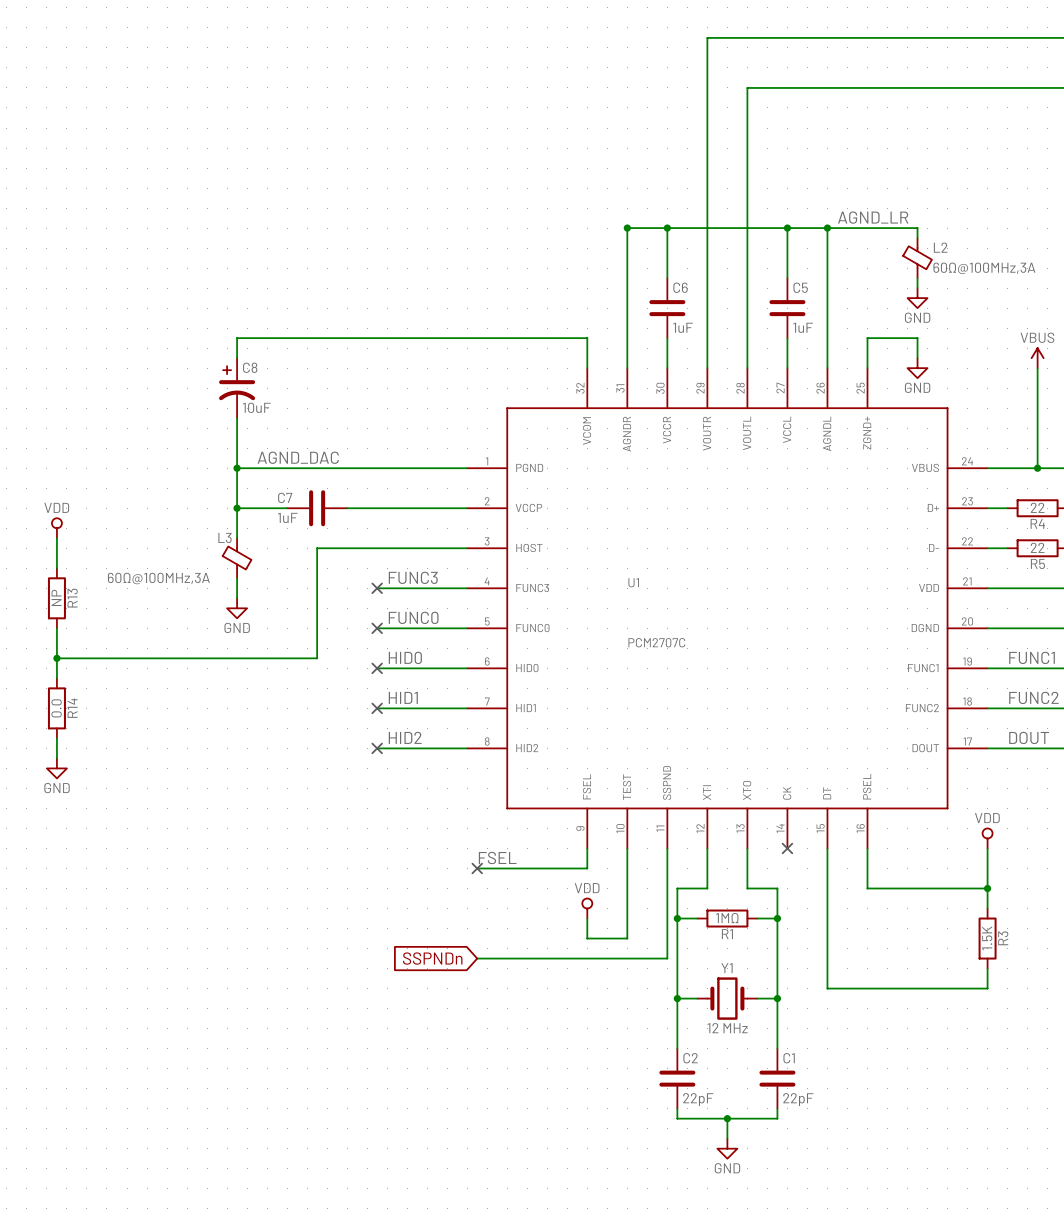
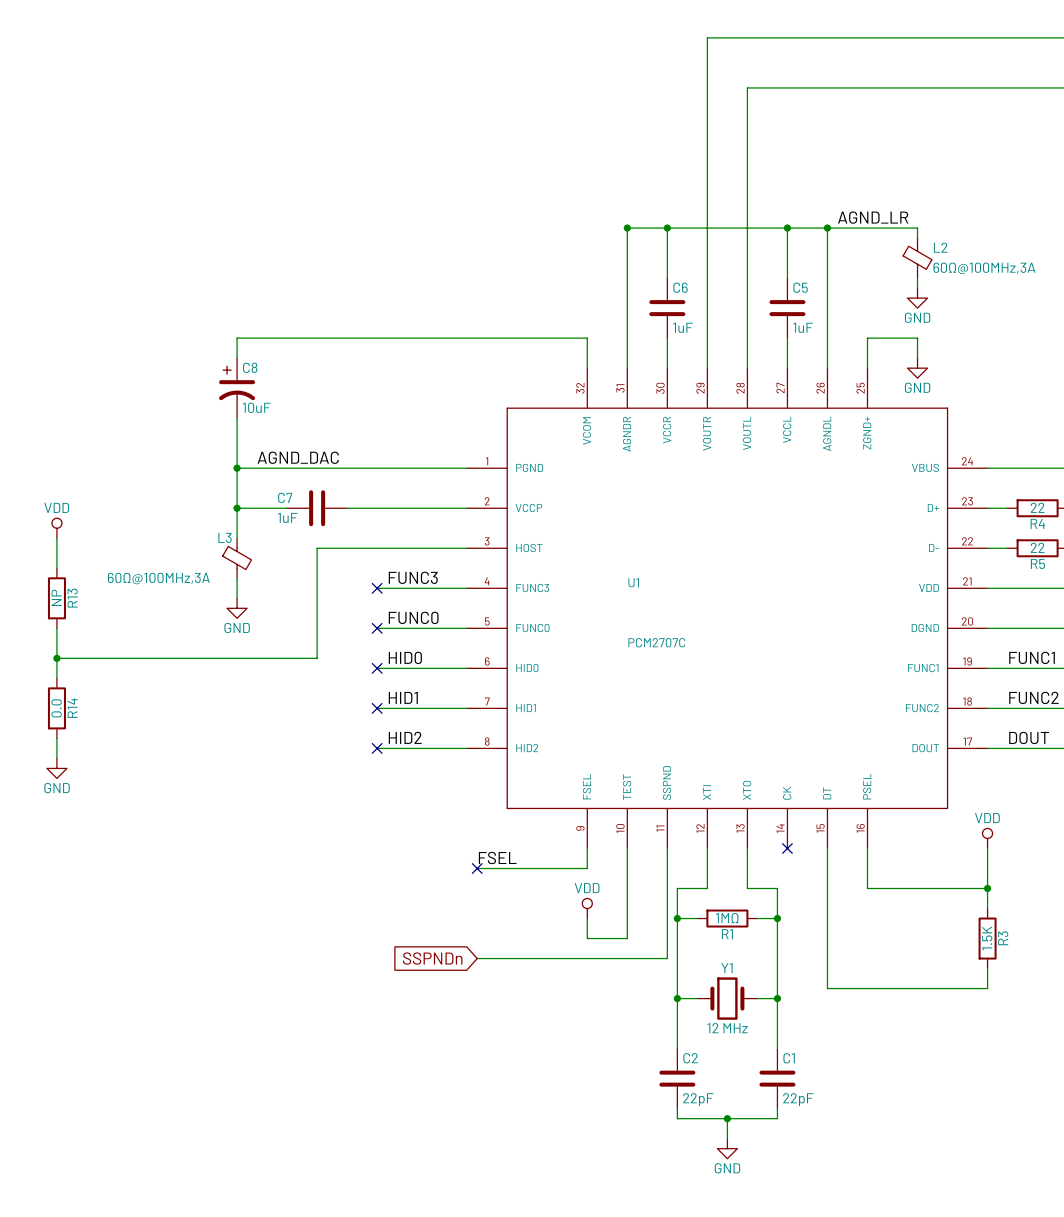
power symbol: VBUS (1037, 358) -> none
wire: (1037, 368) (1037, 468) -> none
junction: (1037, 468) -> none

